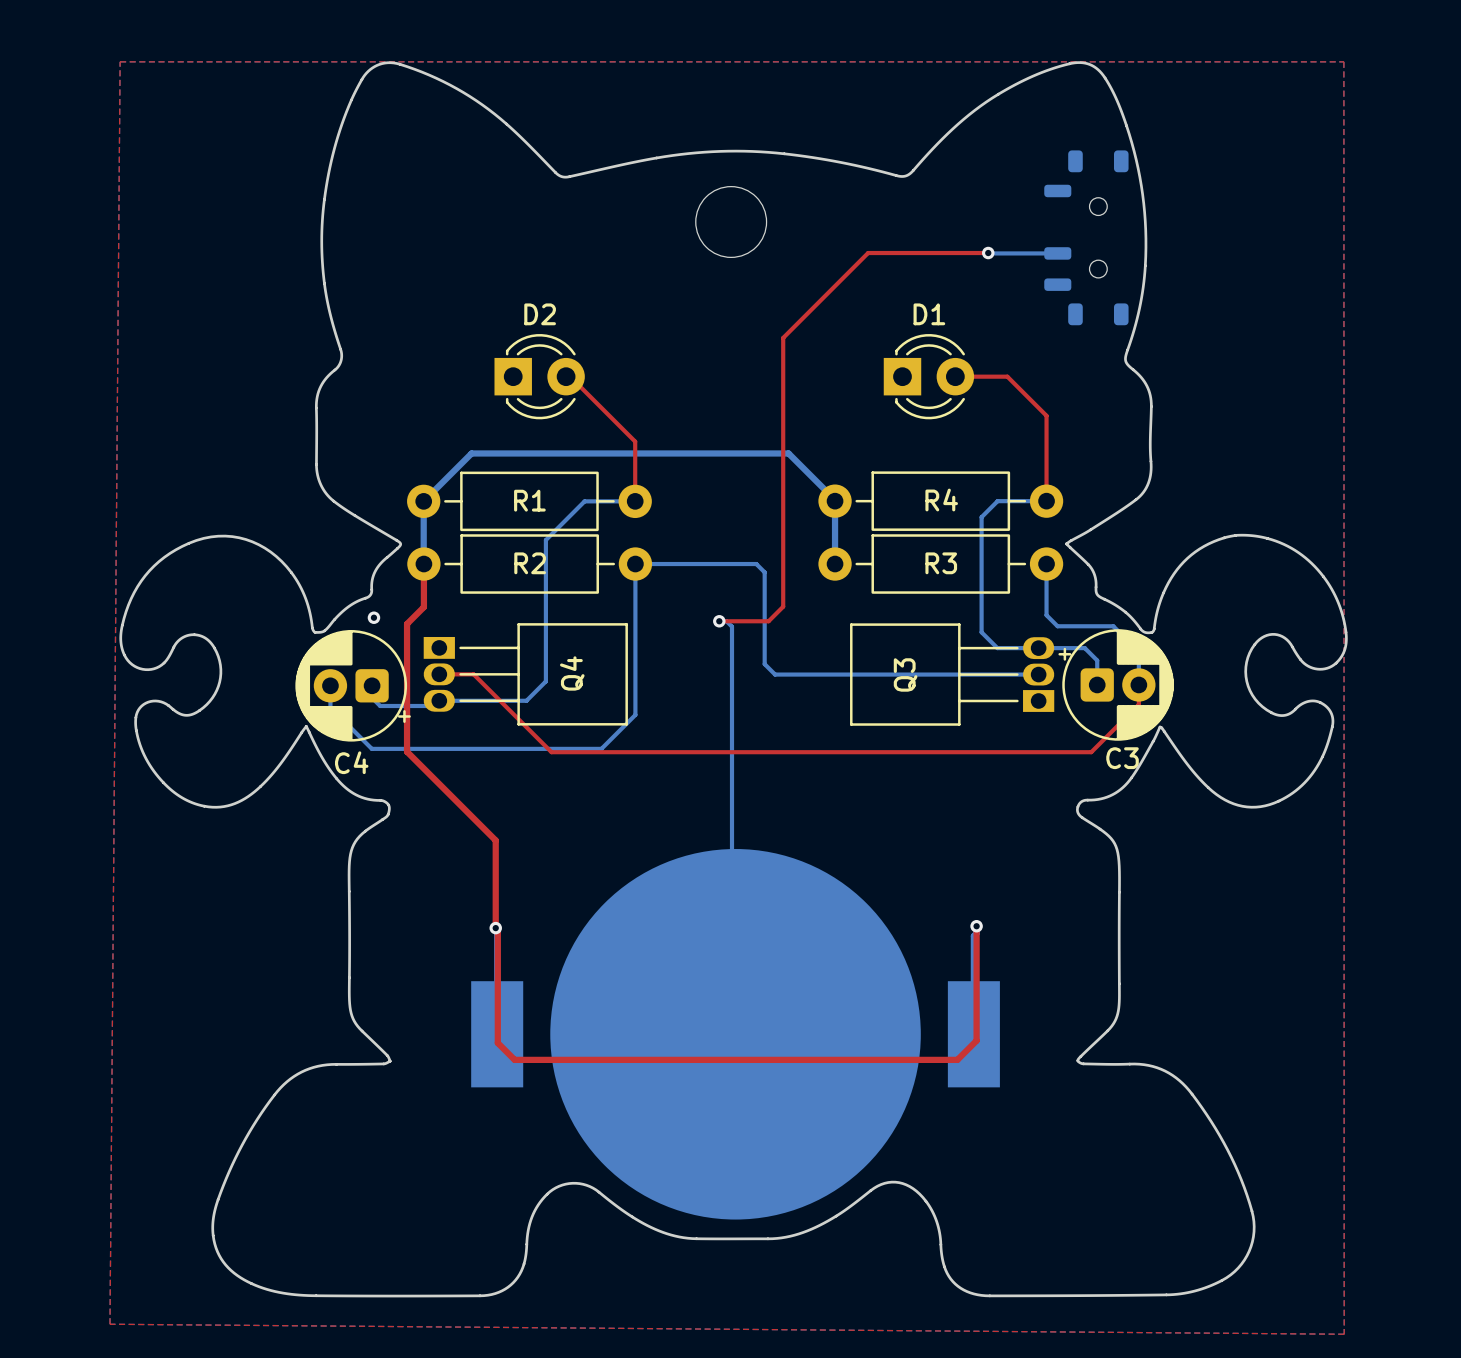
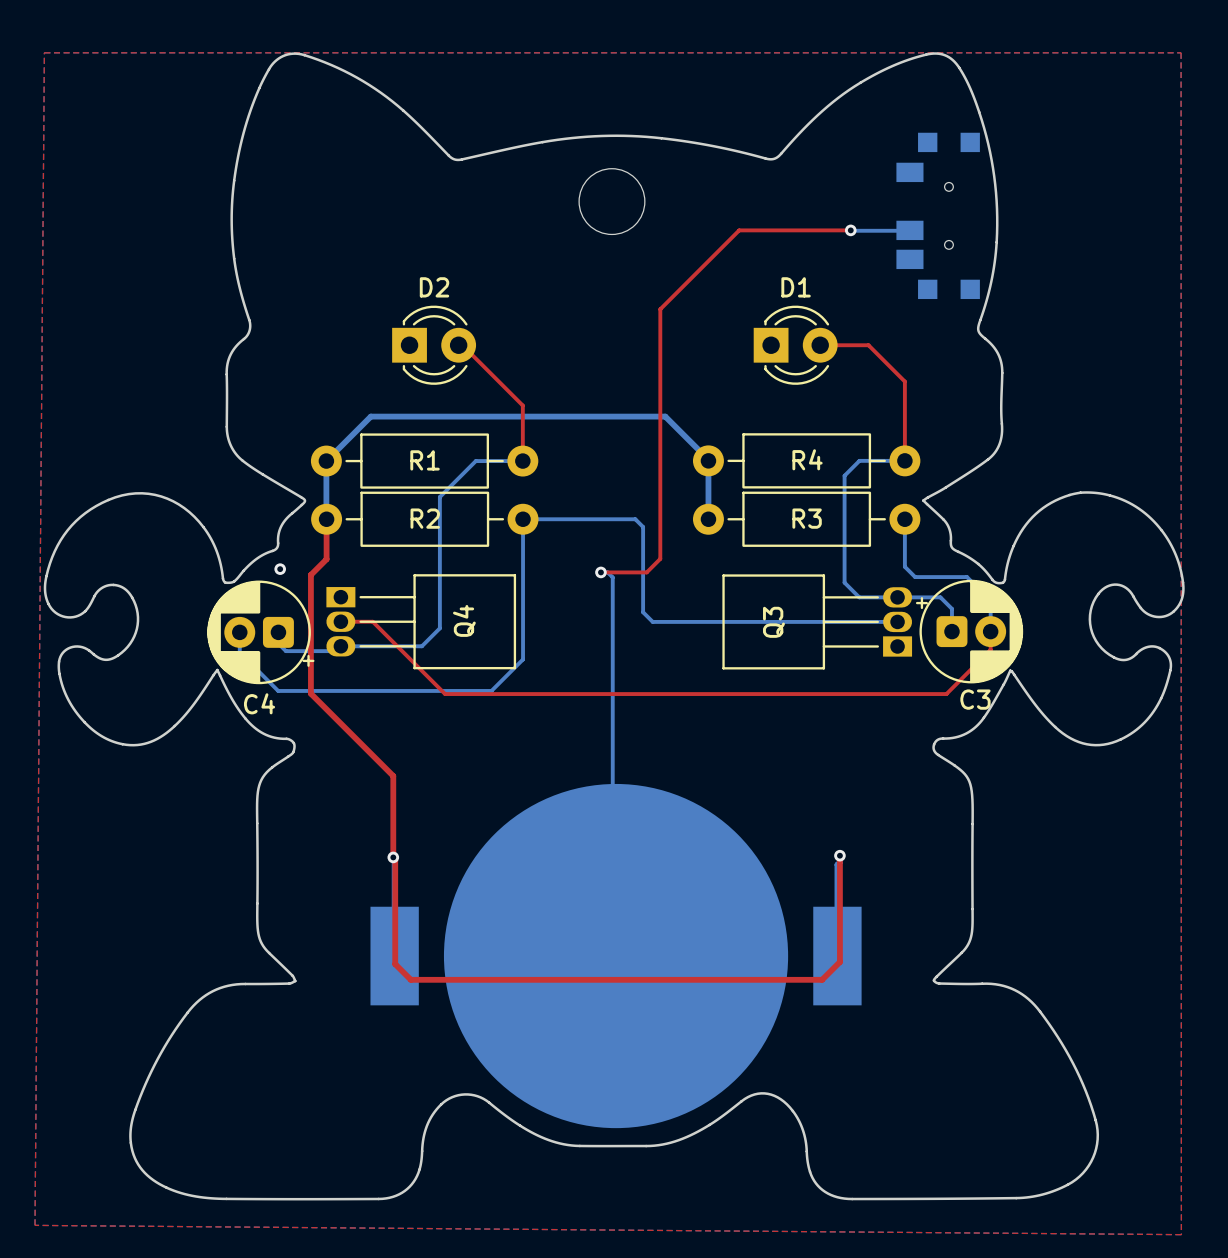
part footprint: [1044, 150, 1129, 326] -> [896, 132, 980, 300]

